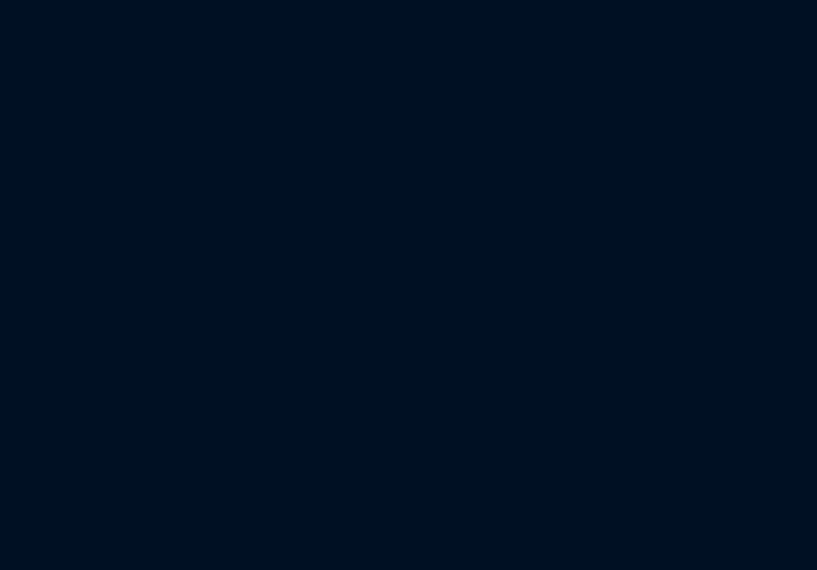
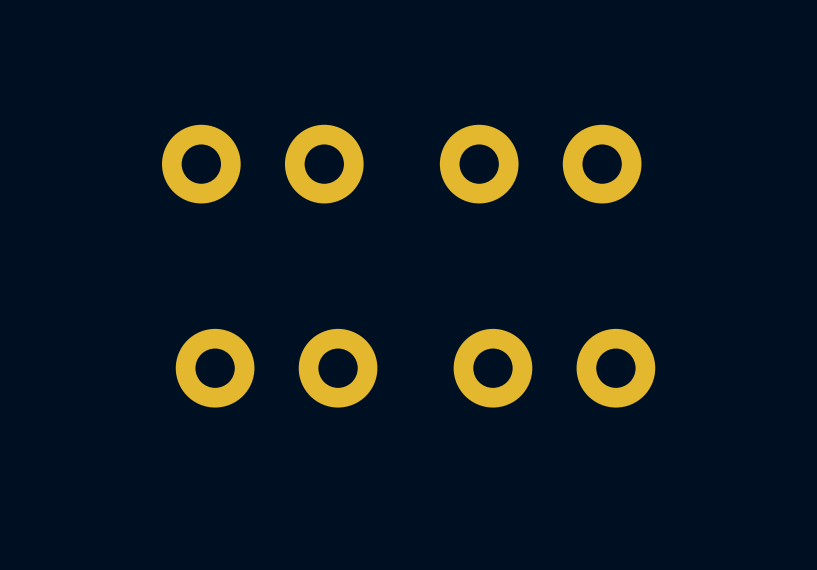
part: none -> (262, 164)
part: none -> (540, 164)
part: none -> (276, 368)
part: none -> (554, 368)

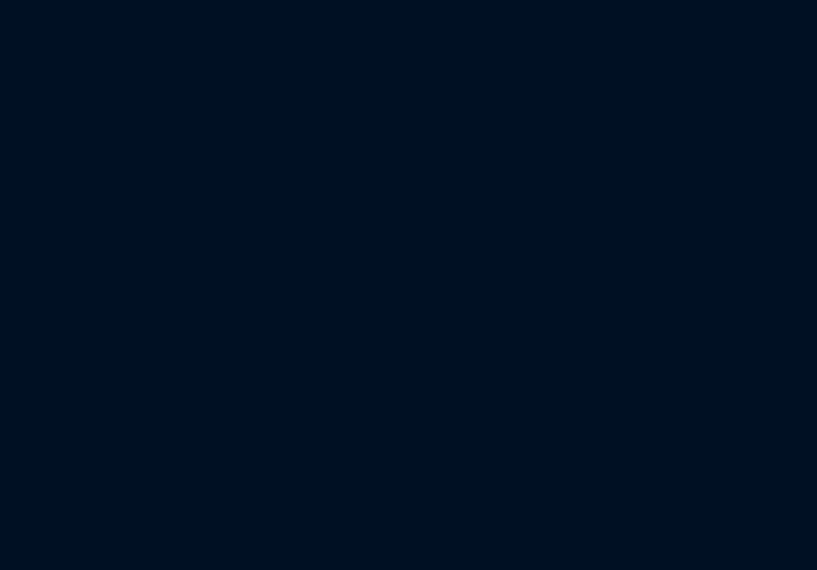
part: (262, 164) -> none
part: (540, 164) -> none
part: (276, 368) -> none
part: (554, 368) -> none

